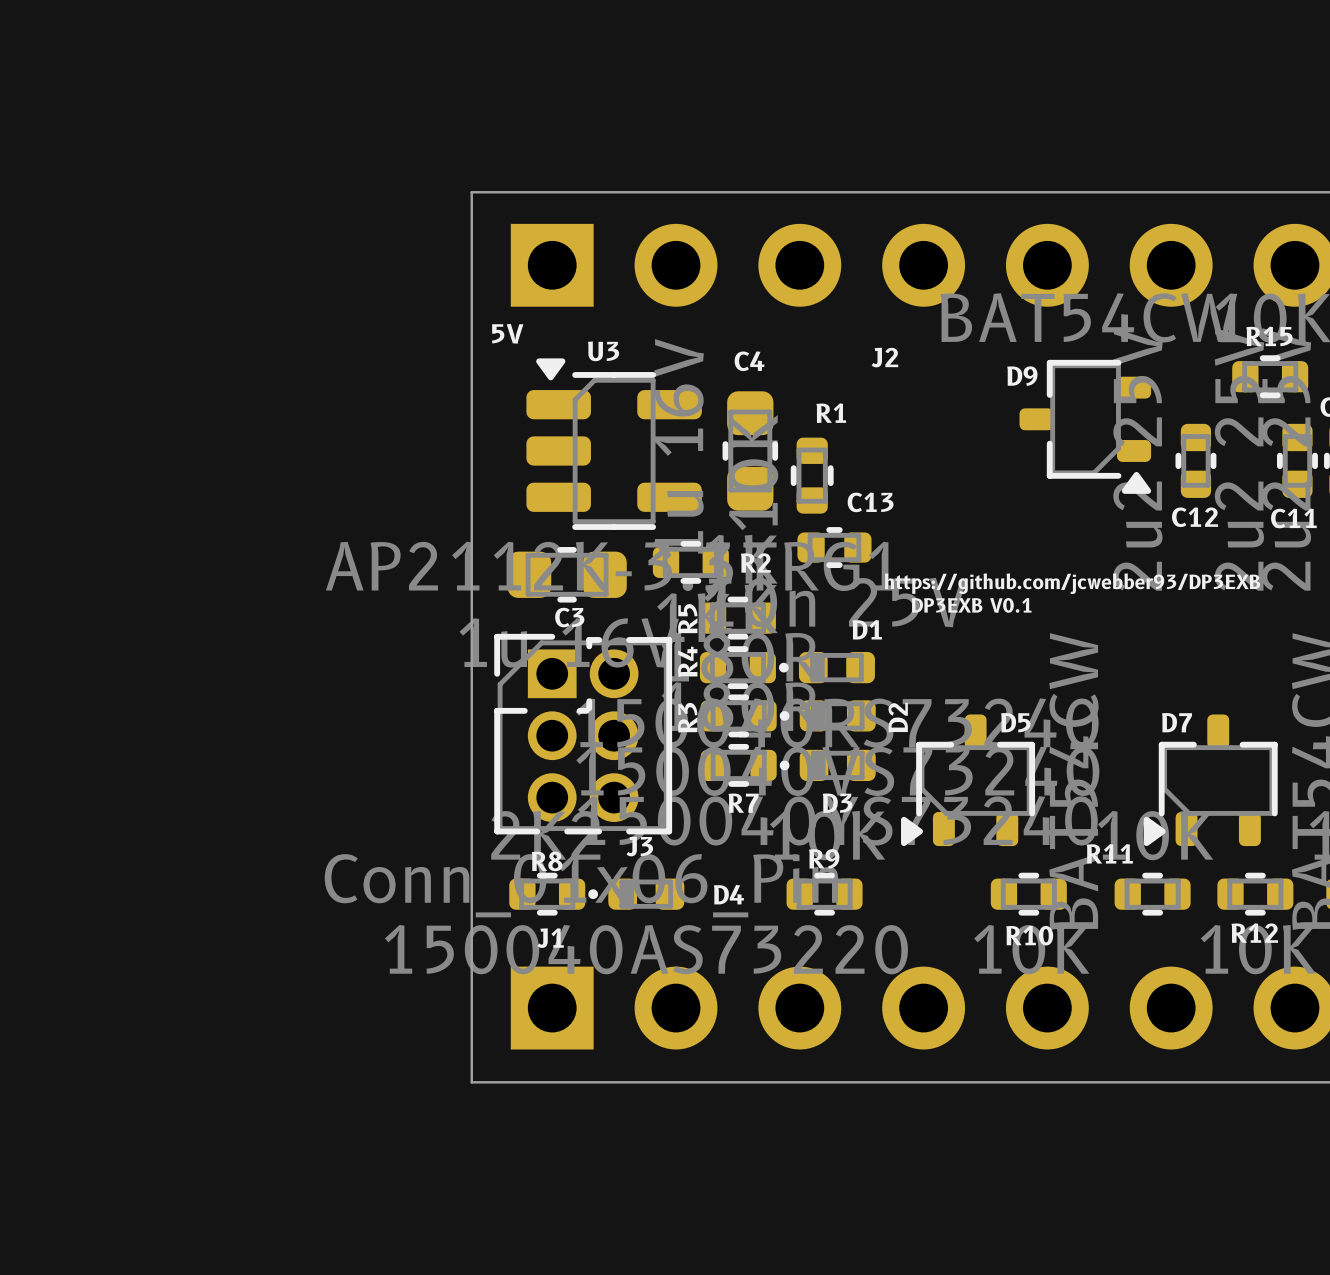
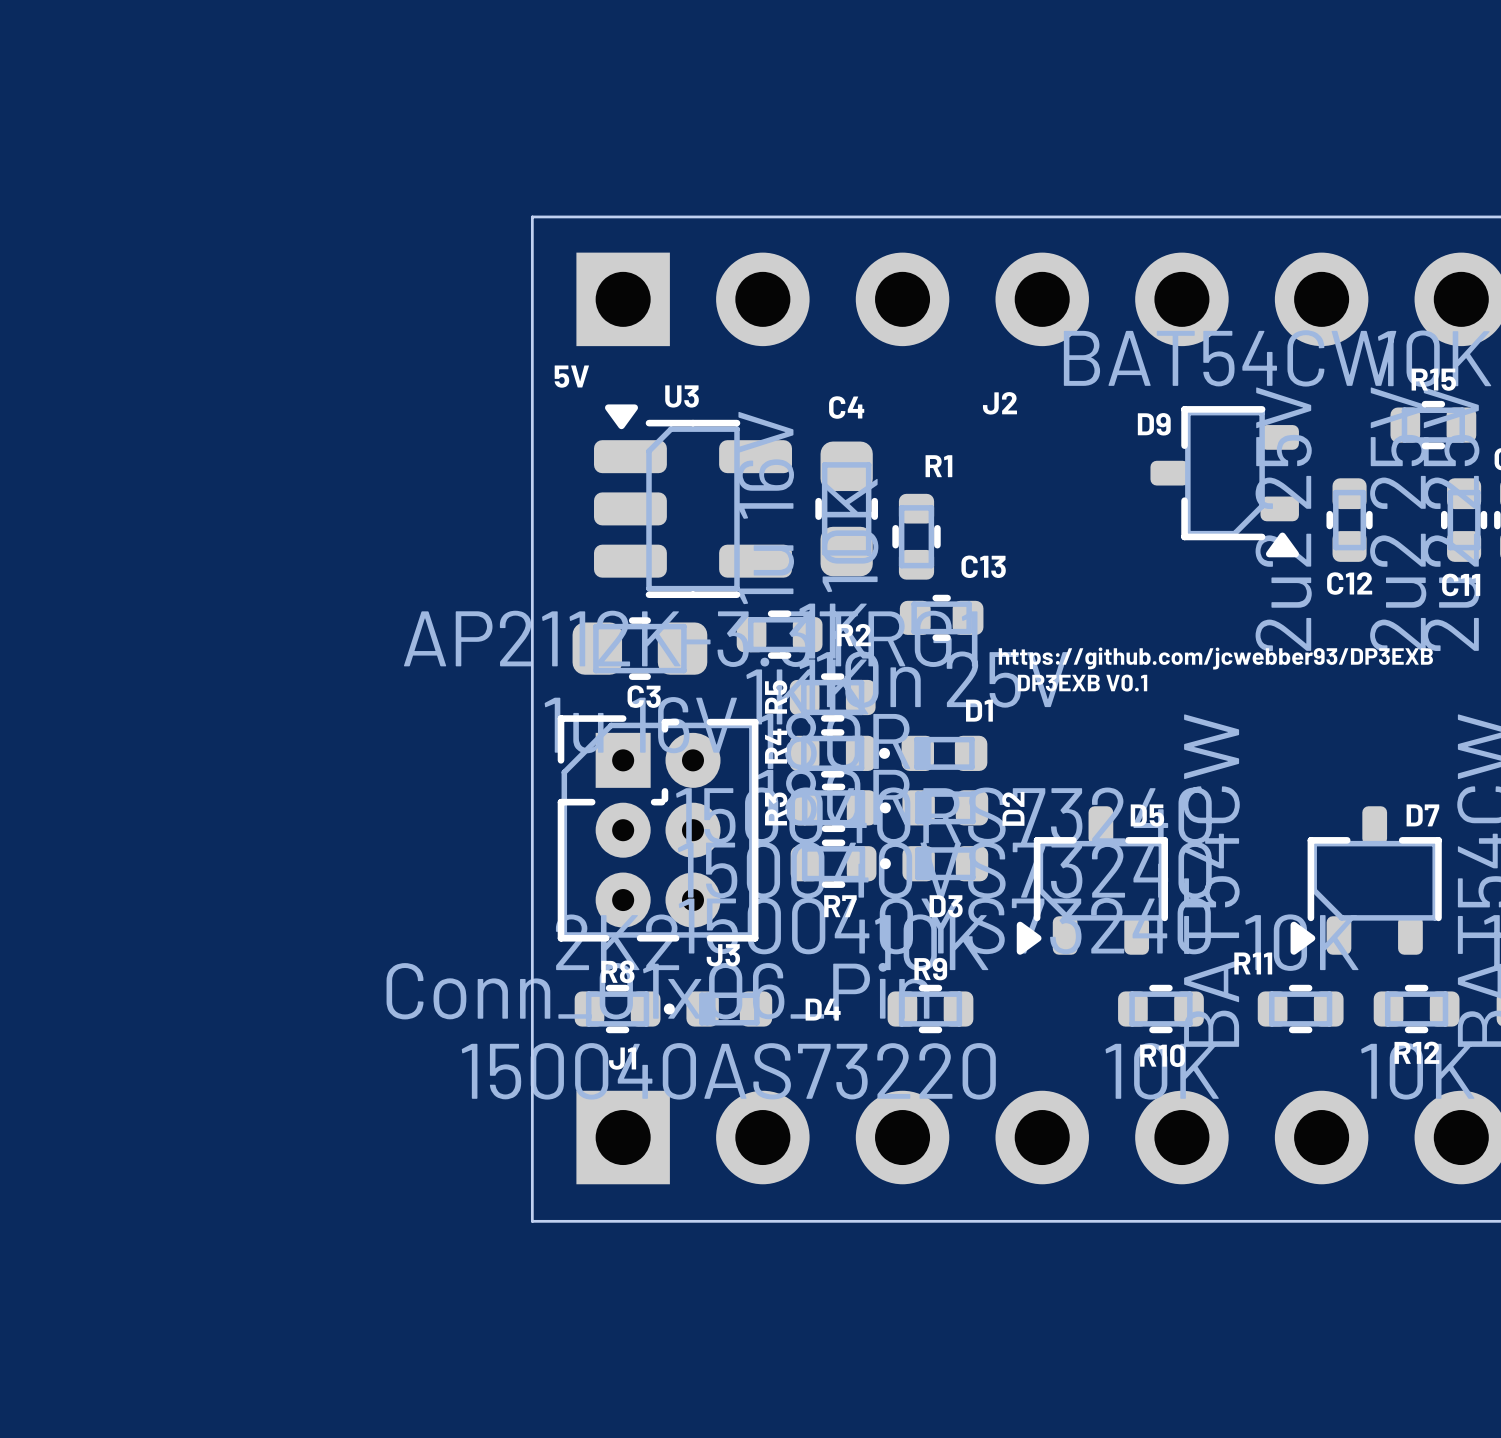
J3 footprint: [494, 633, 673, 835] -> [557, 715, 759, 942]
D7 name position: D7 (1177, 722) -> D7 (1422, 815)

